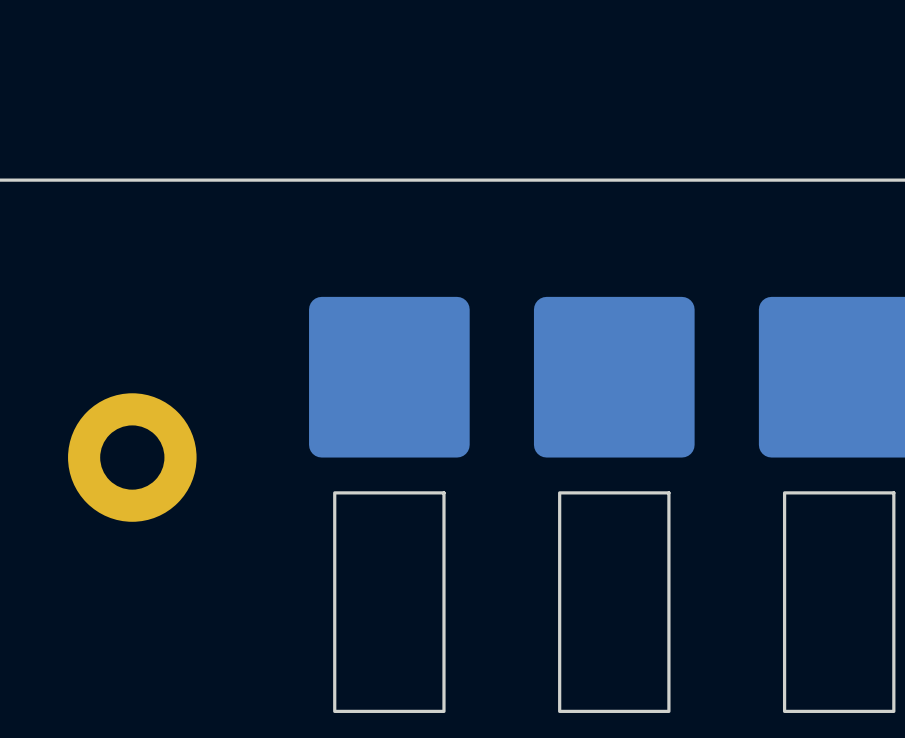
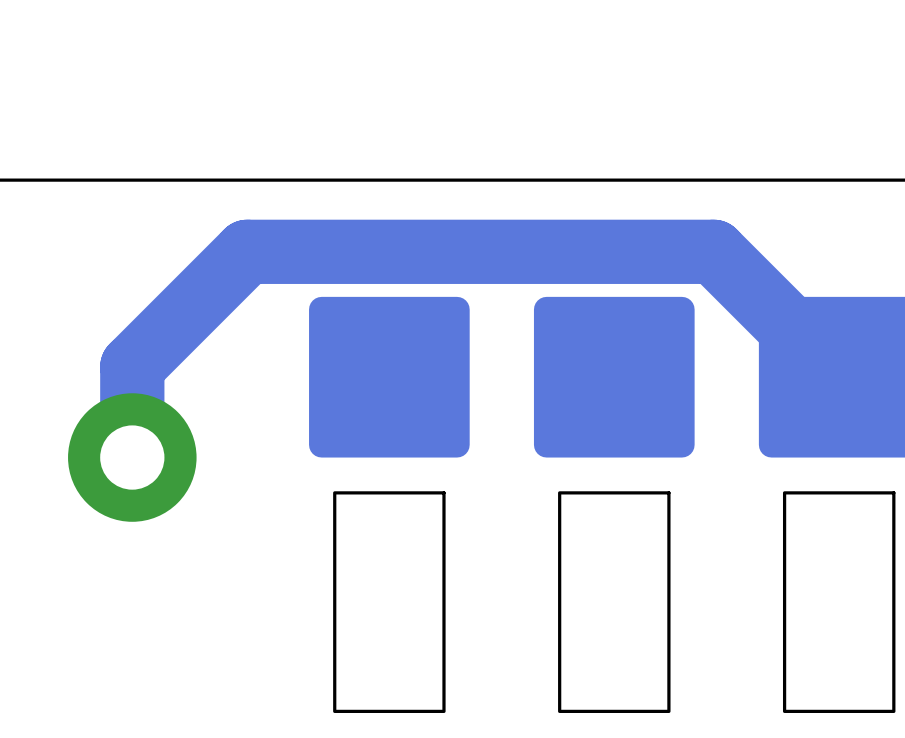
bottom track: none -> (839, 377) (713, 251) (247, 251) (132, 366) (132, 457)

